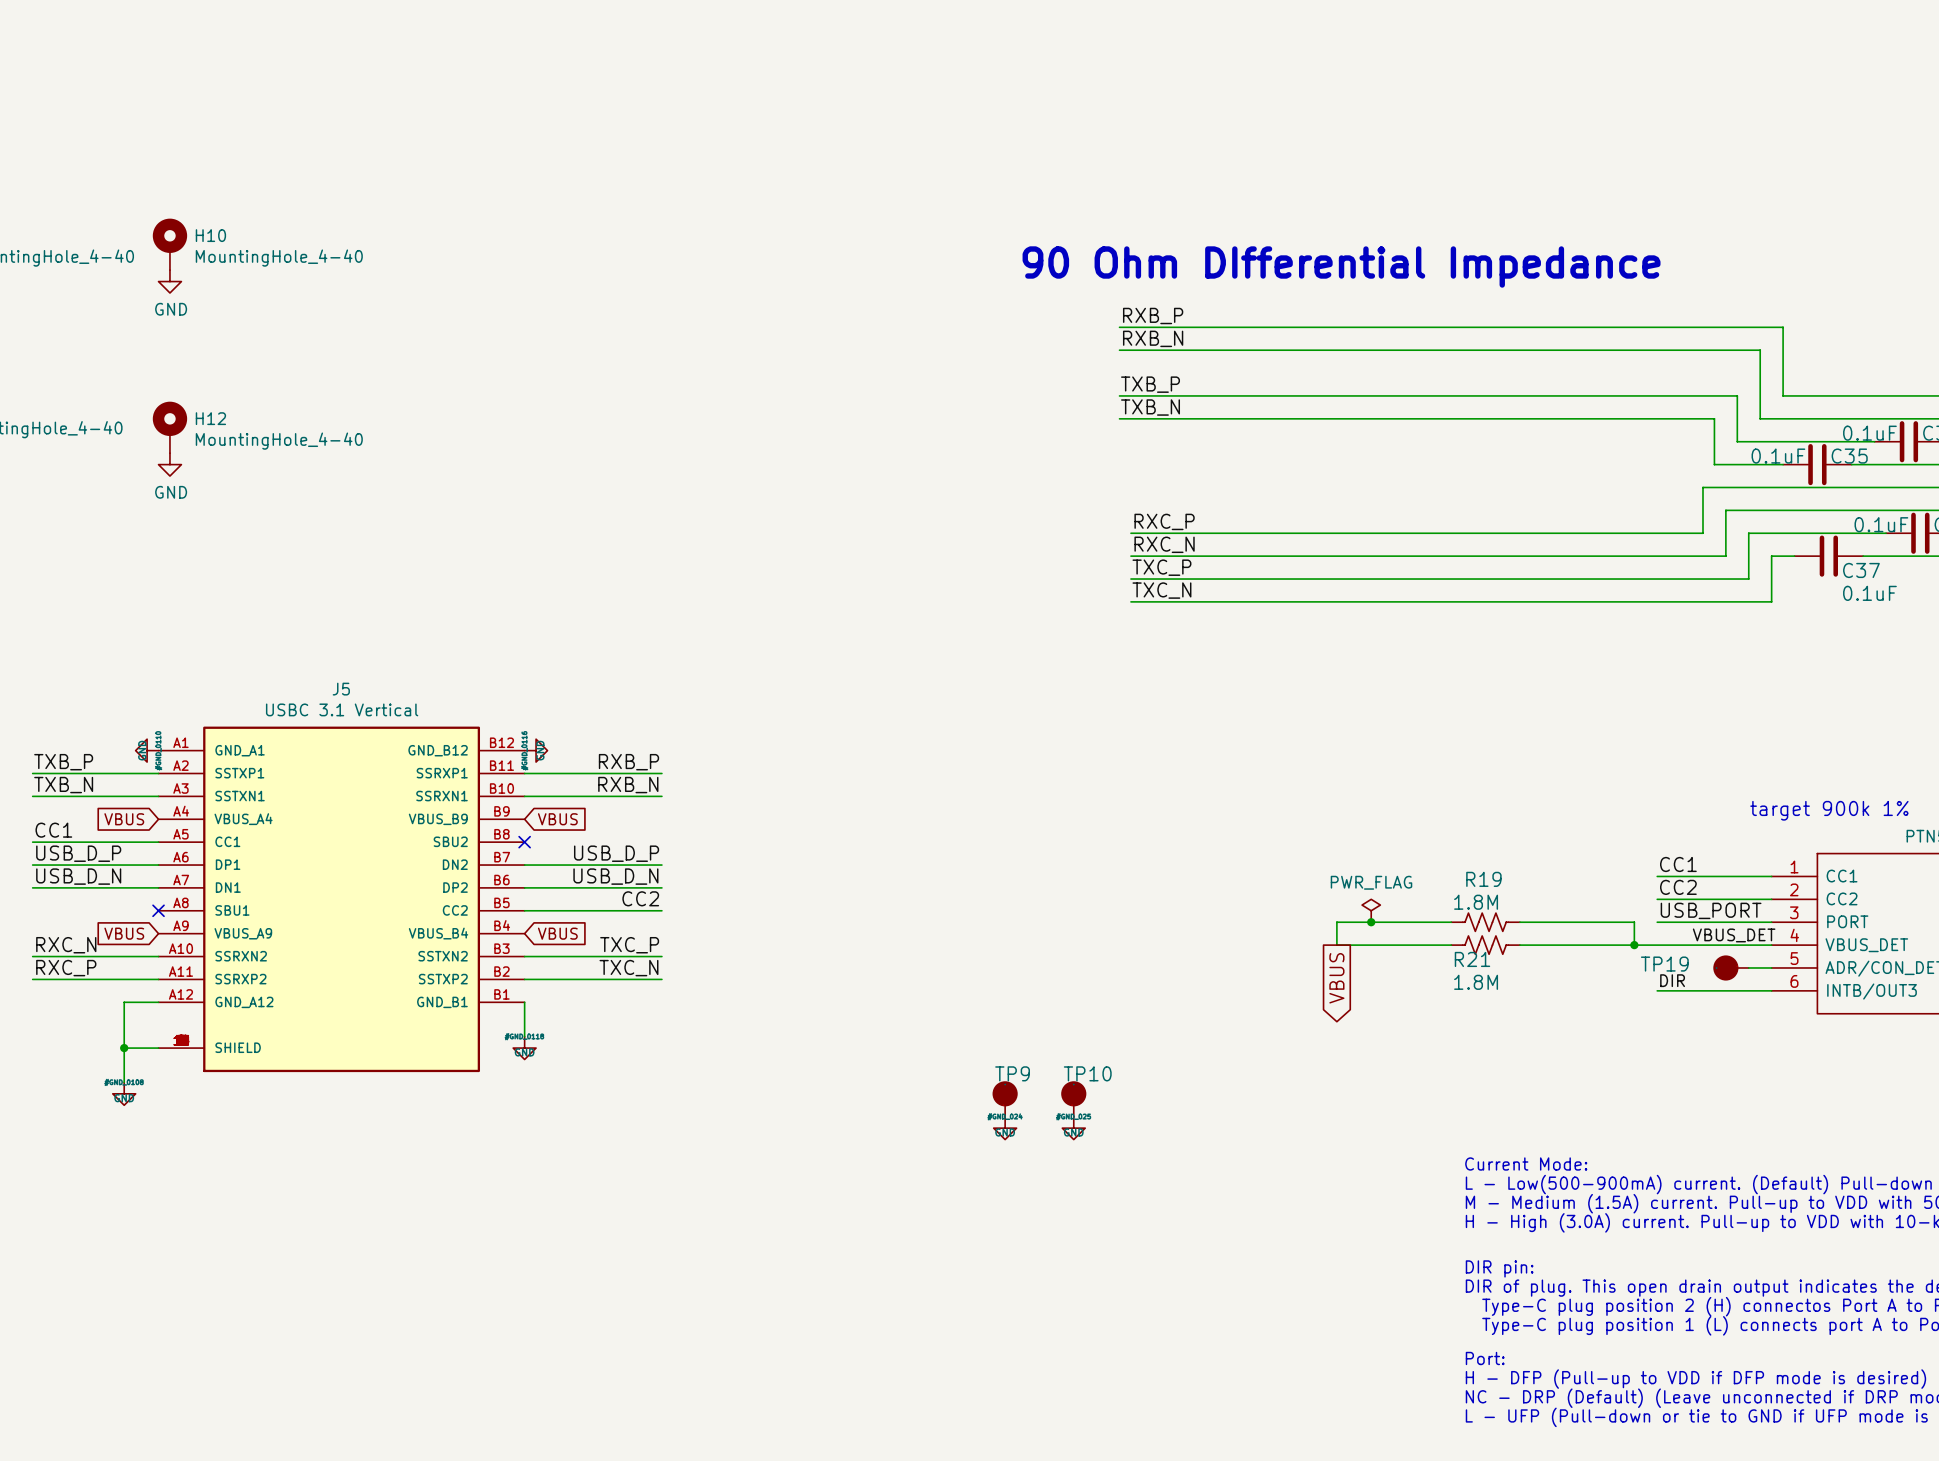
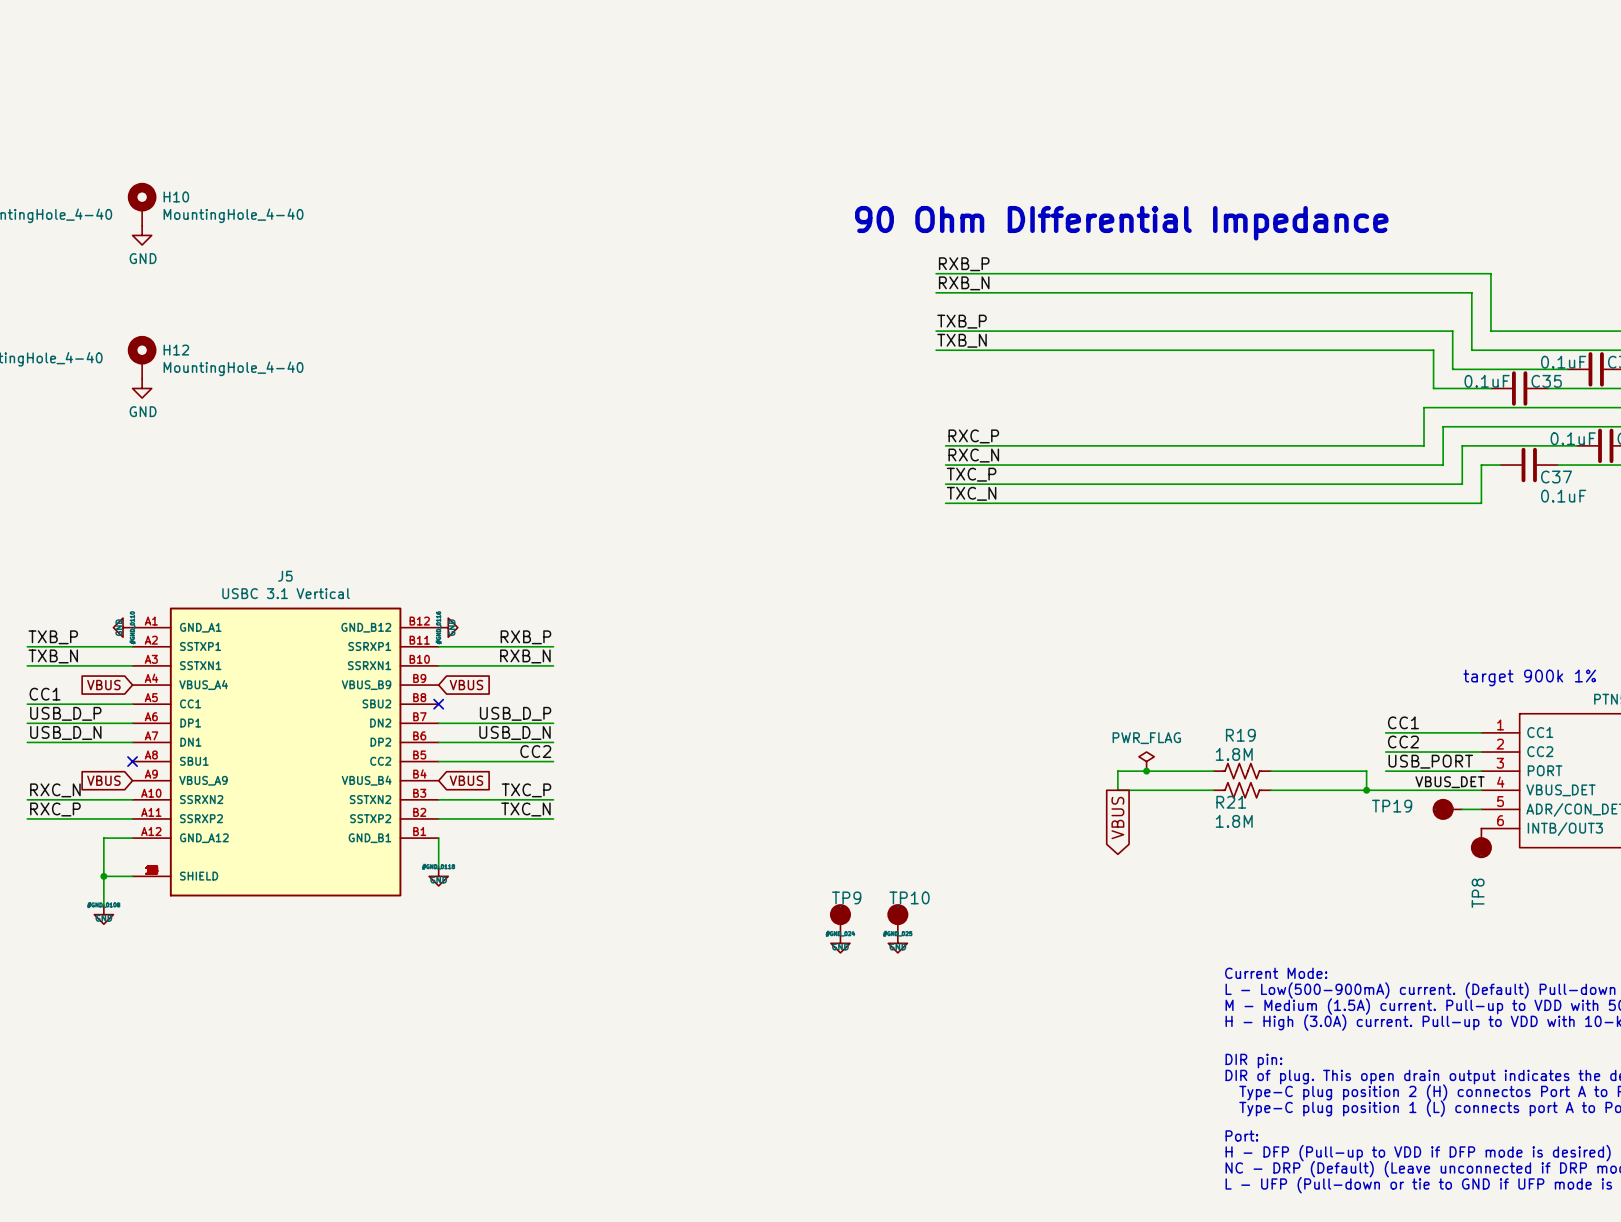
label: DIR (1672, 980) -> none
wire: (1657, 990) (1771, 990) -> none
TP8: none -> (1481, 843)

